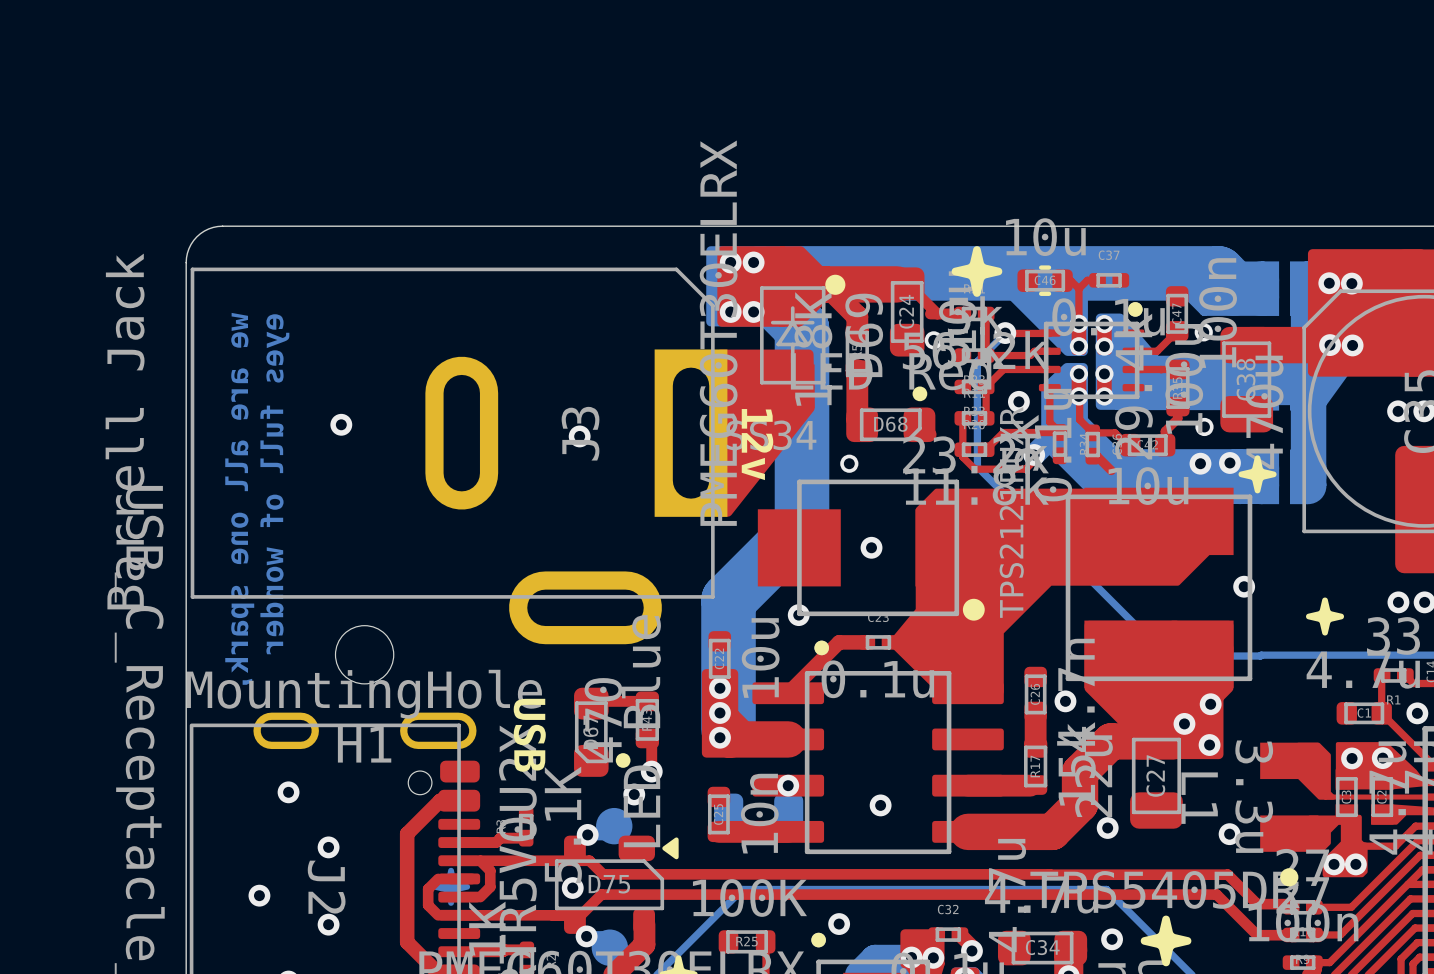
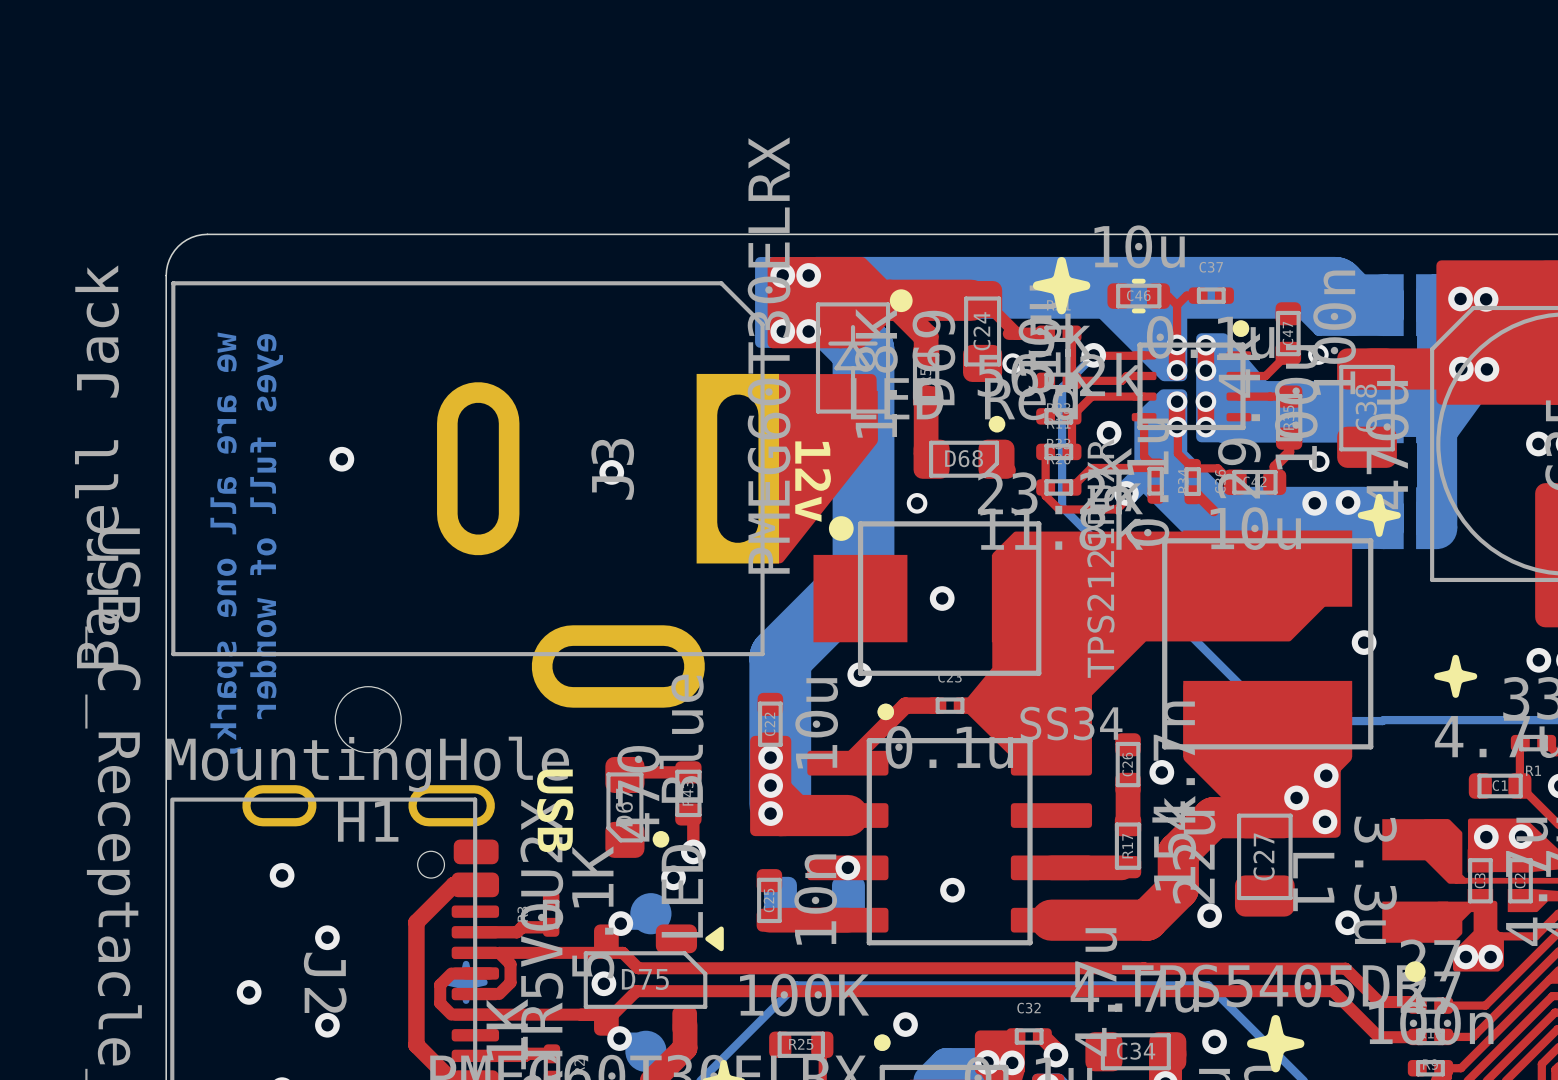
part rotation: 0° (878, 550) -> 180° (949, 596)

